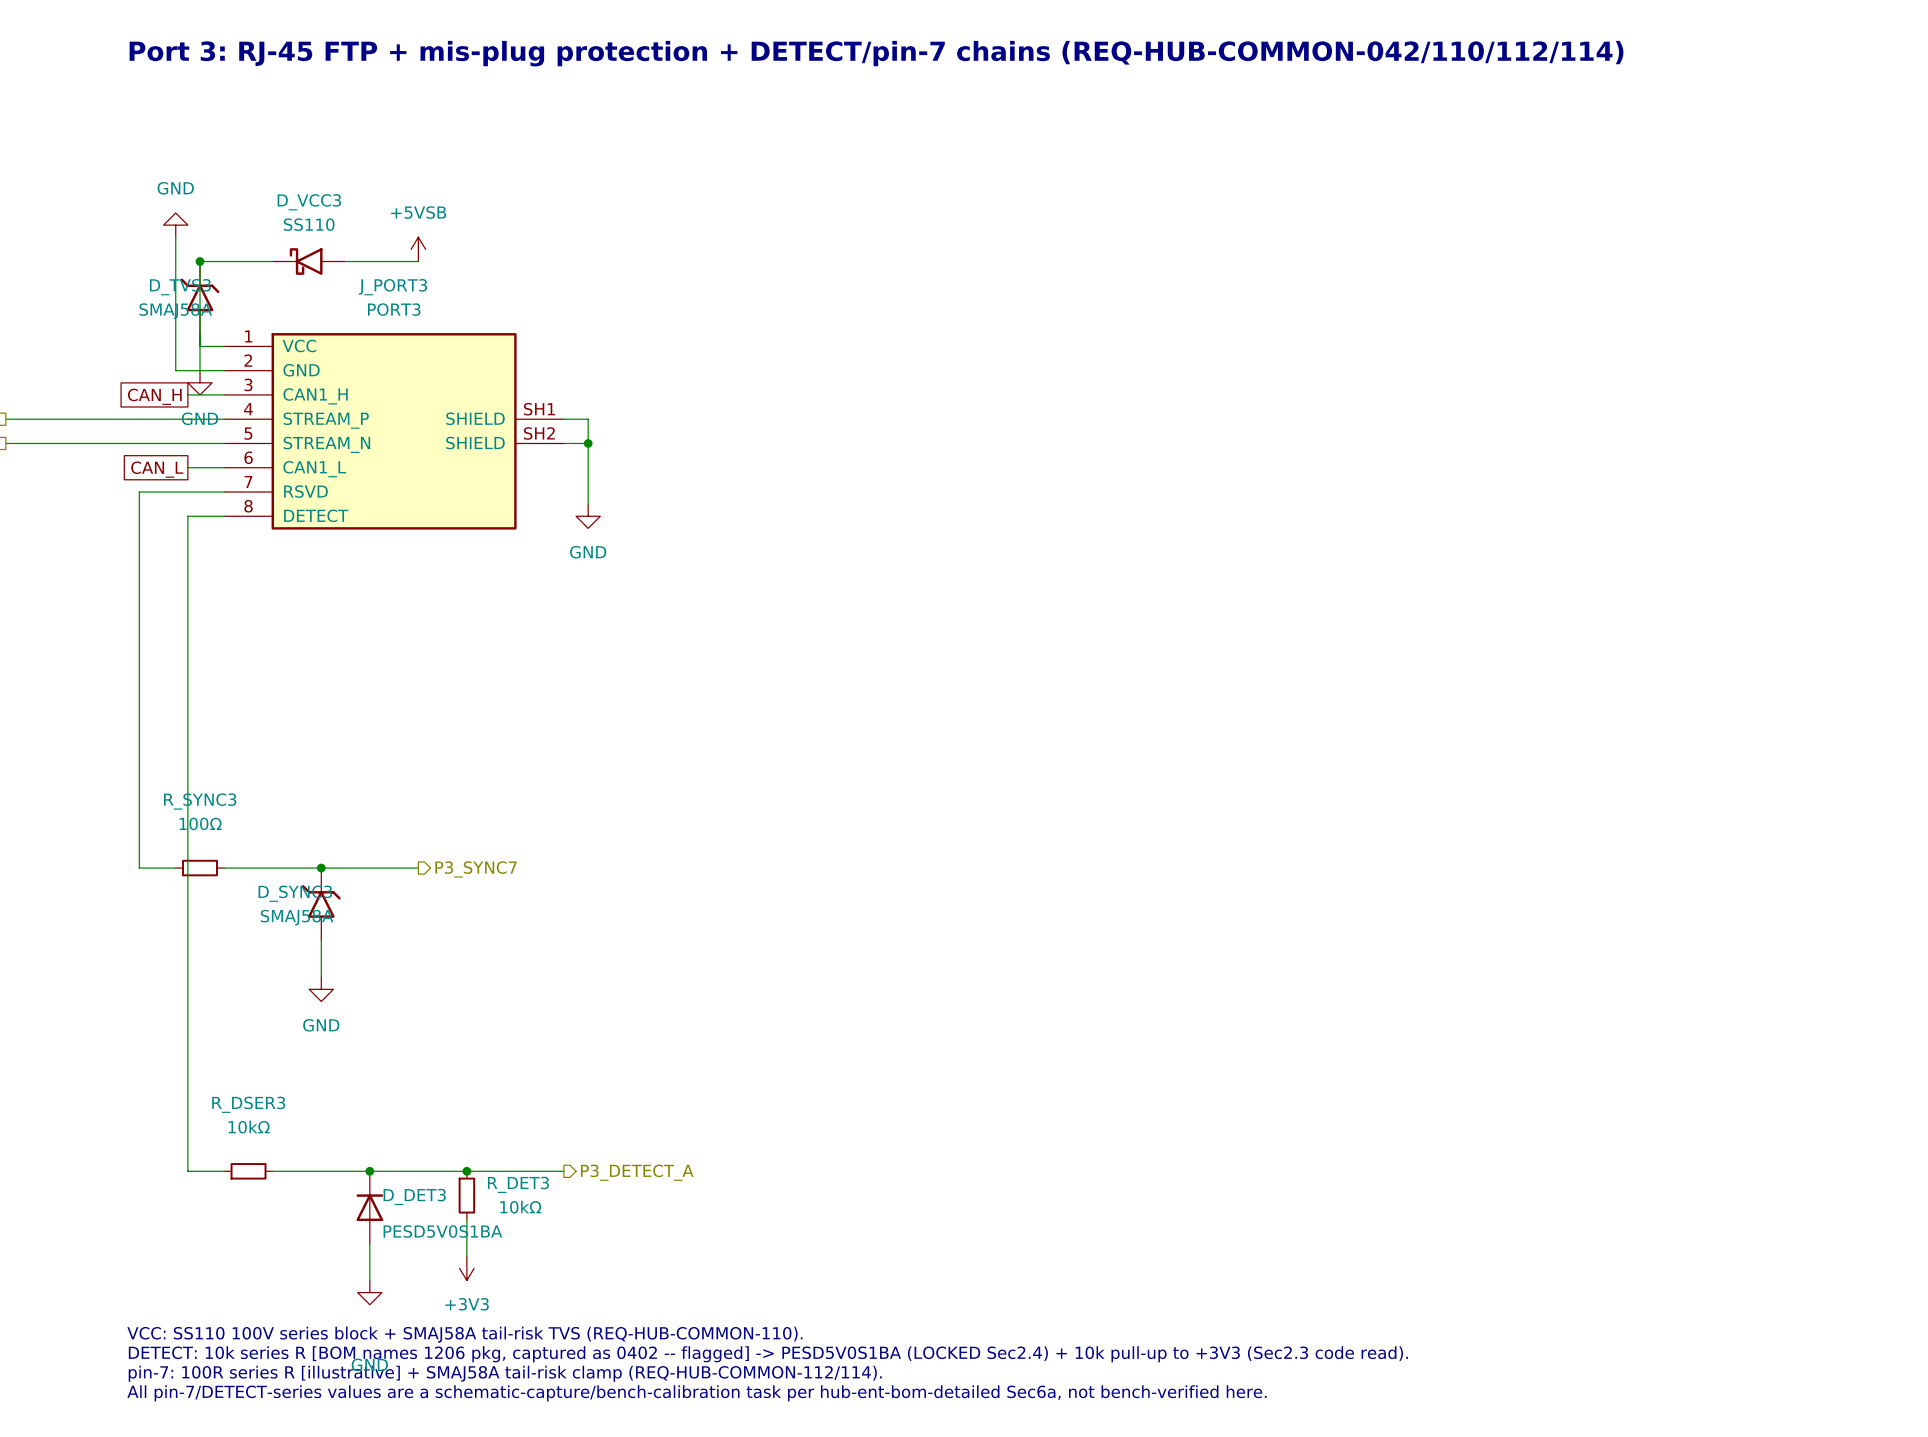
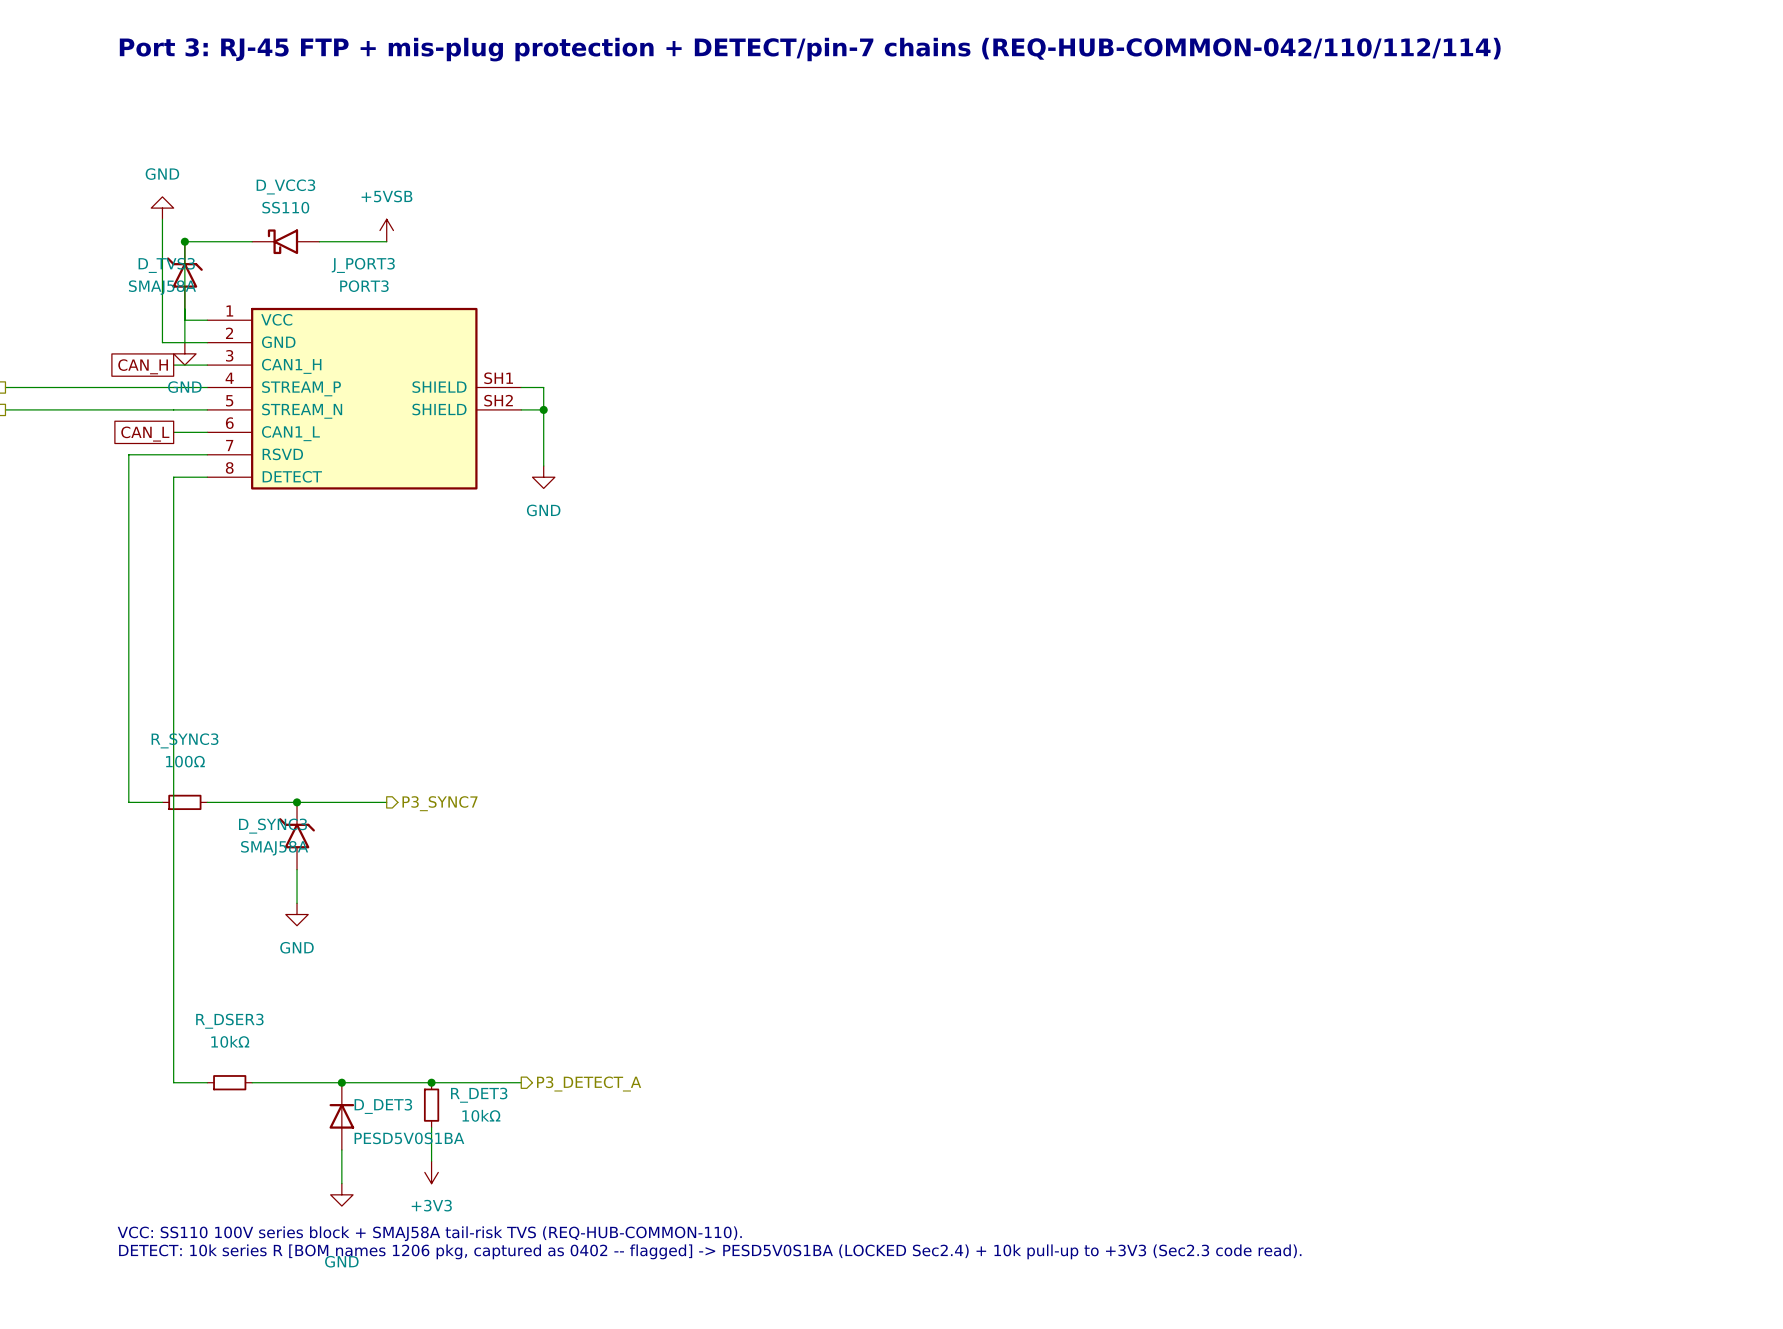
text: pin-7: 100R series R [illustrative] + SMAJ58A tail-risk clamp (REQ-HUB-COMMON-112/114). (505, 1373) -> none
text: All pin-7/DETECT-series values are a schematic-capture/bench-calibration task per hub-ent-bom-detailed Sec6a, not bench-verified here. (696, 1393) -> none

